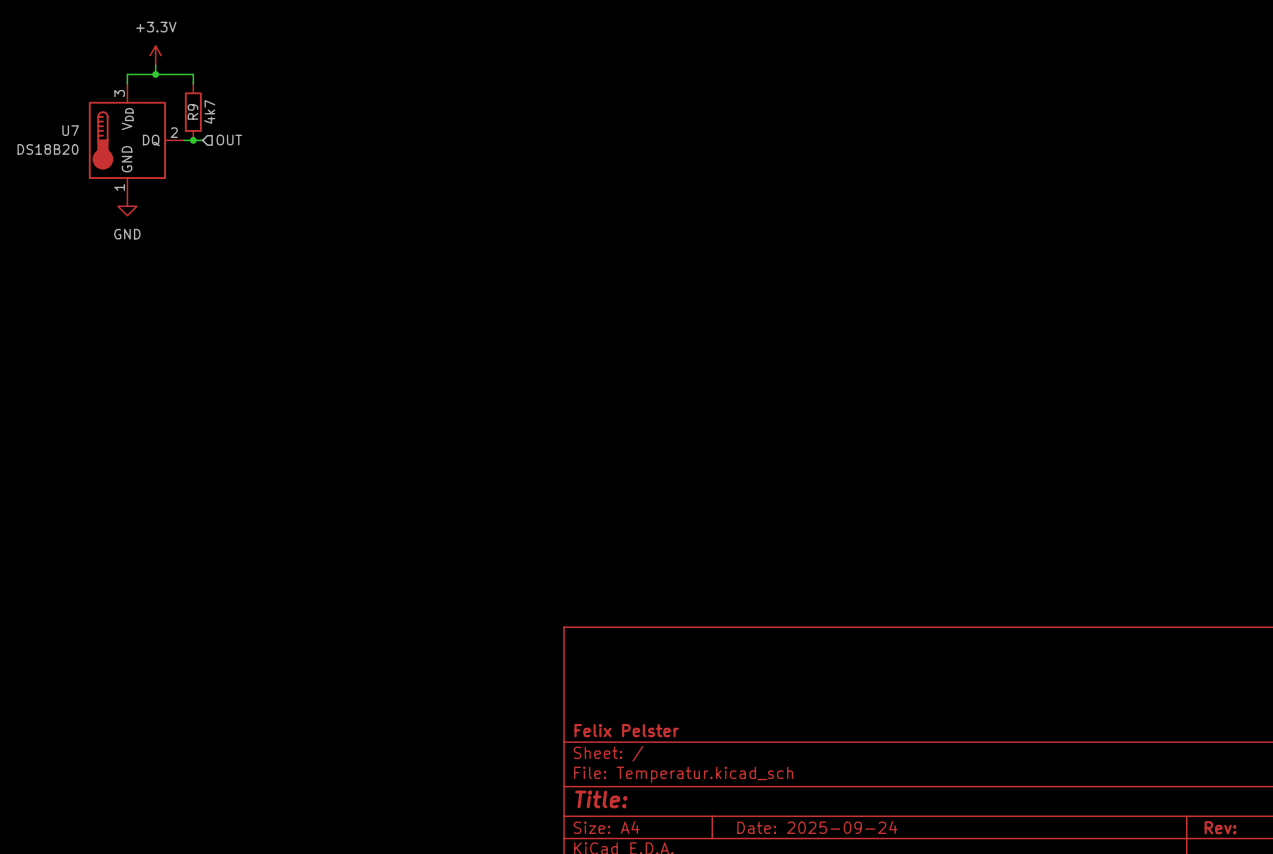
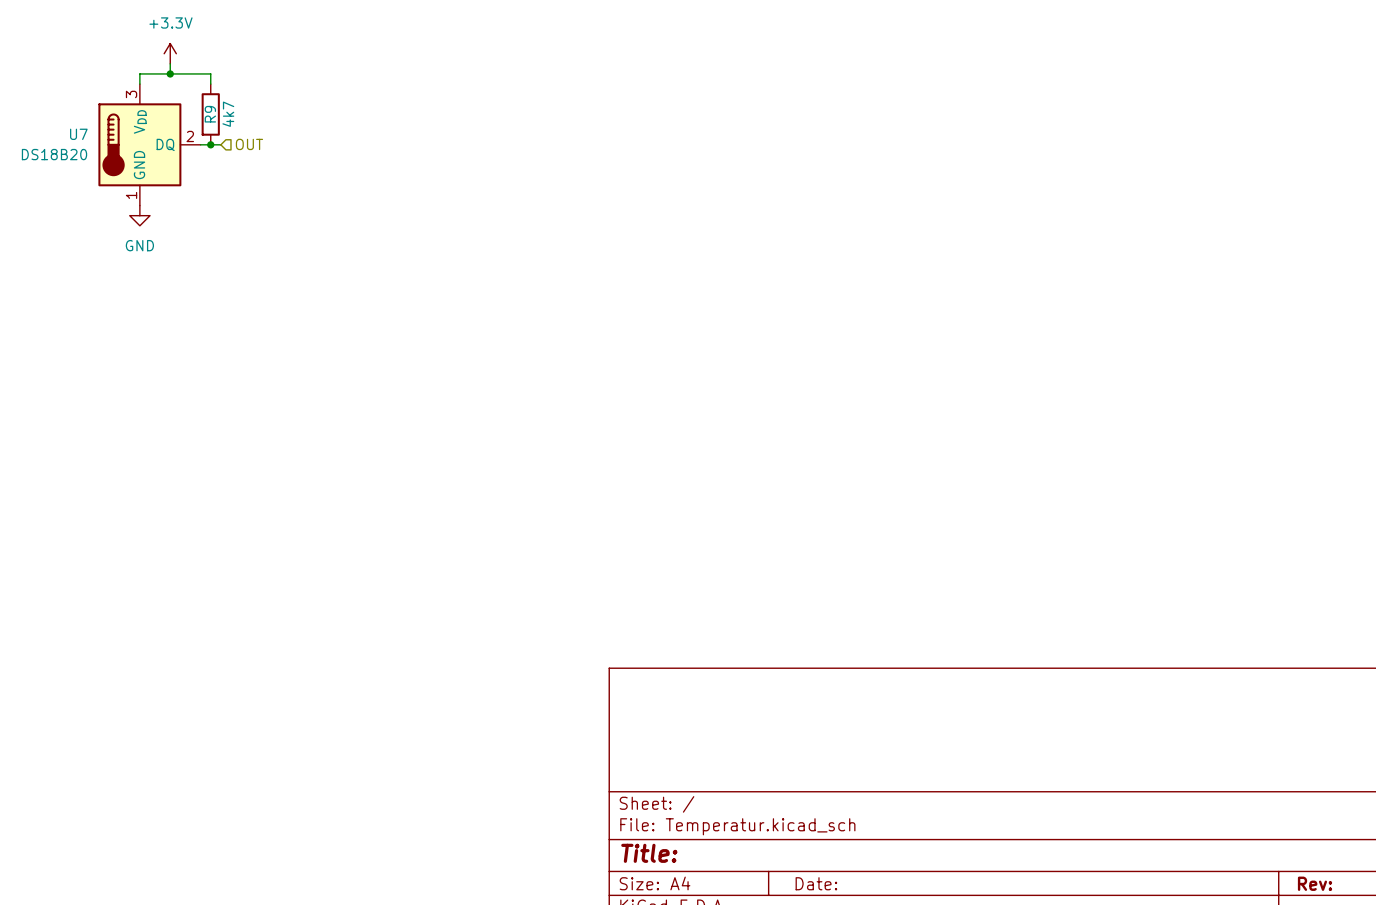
title block: Felix Pelster (626, 730) -> none
title block: Date: 2025-09-24 (817, 827) -> Date: (816, 883)

